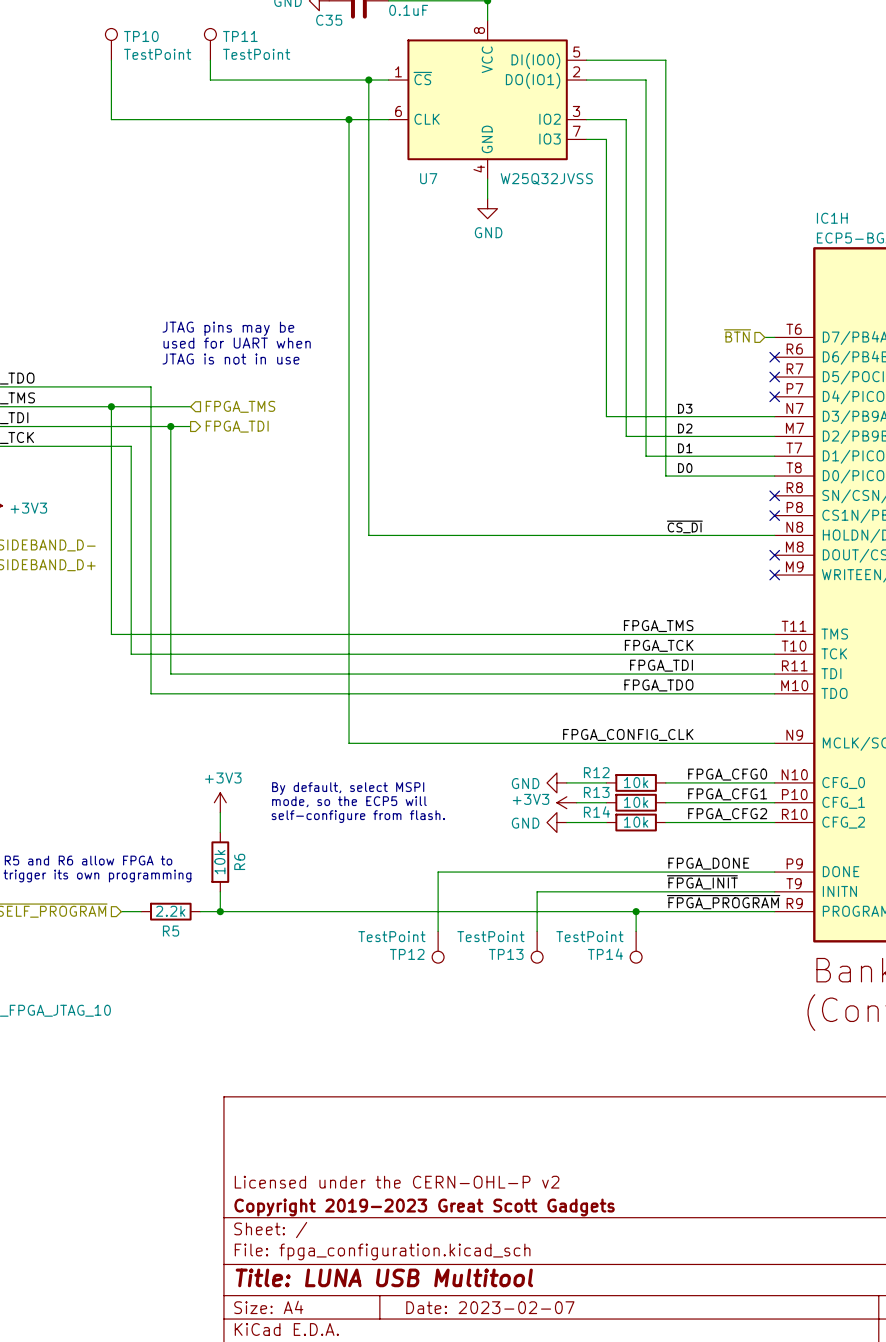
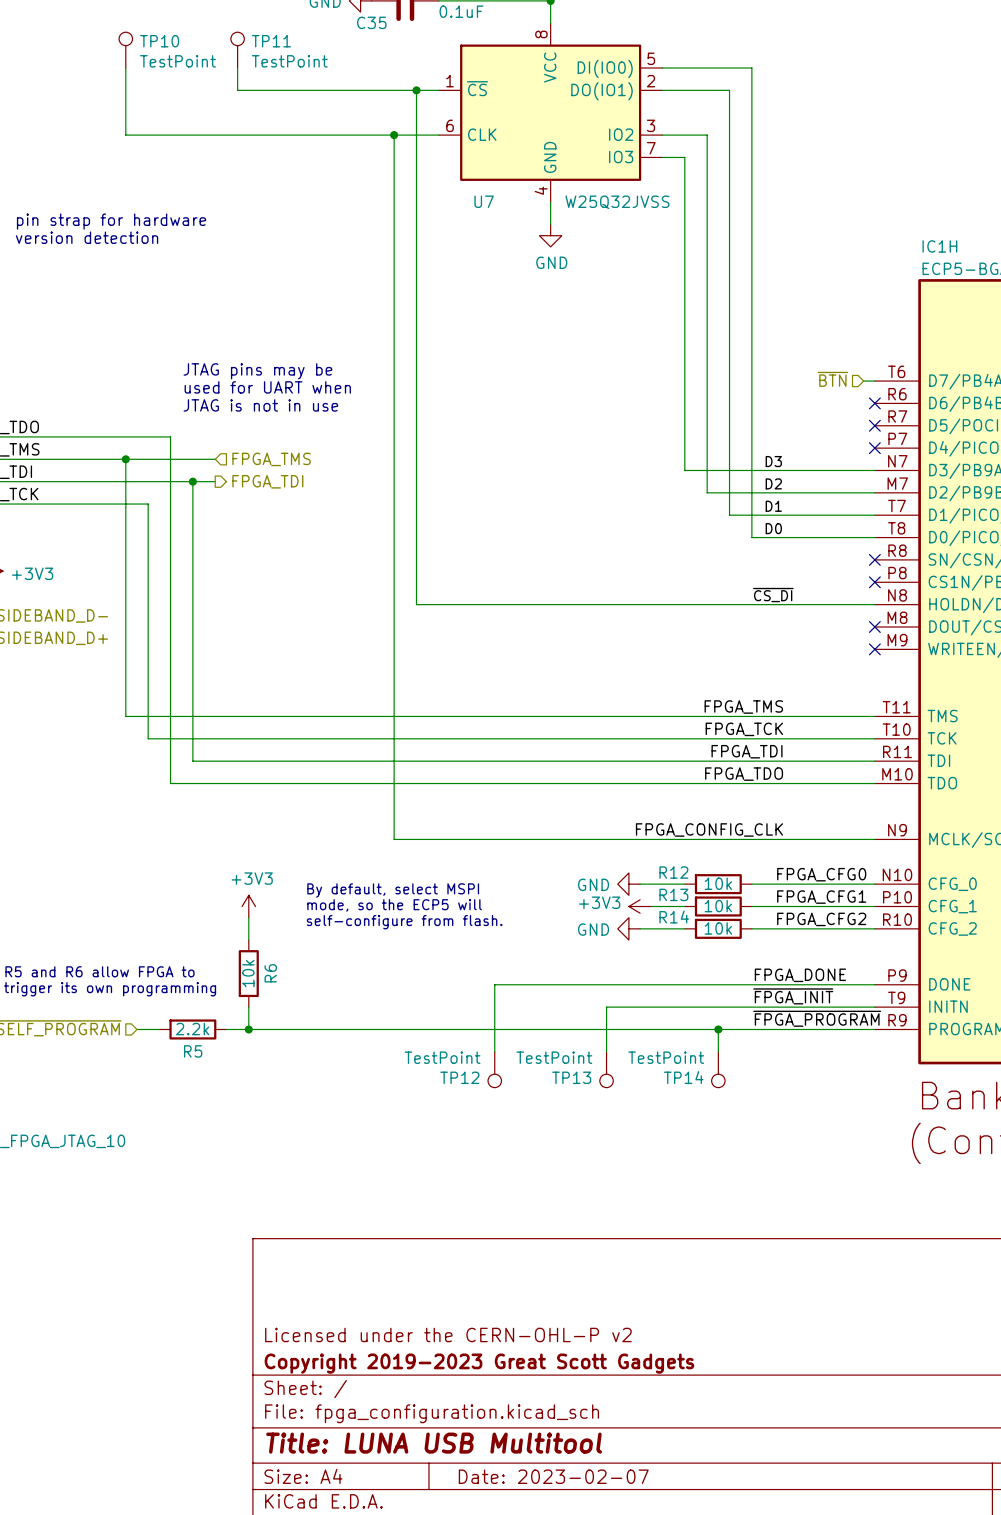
text: none -> pin strap for hardware (111, 221)
text: none -> version detection (87, 237)

